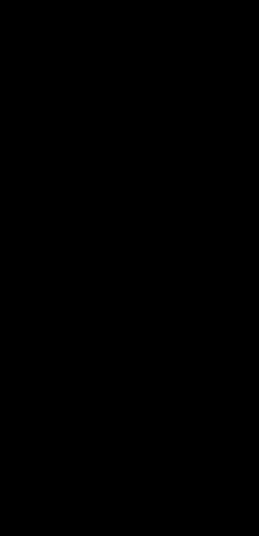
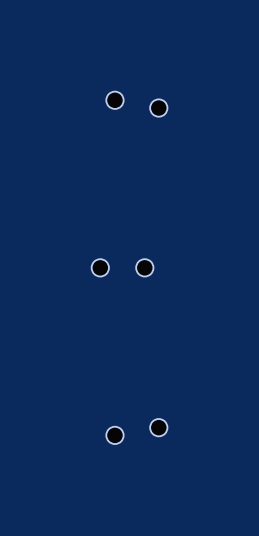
part: none -> (136, 104)
part: none -> (122, 267)
part: none -> (136, 431)

